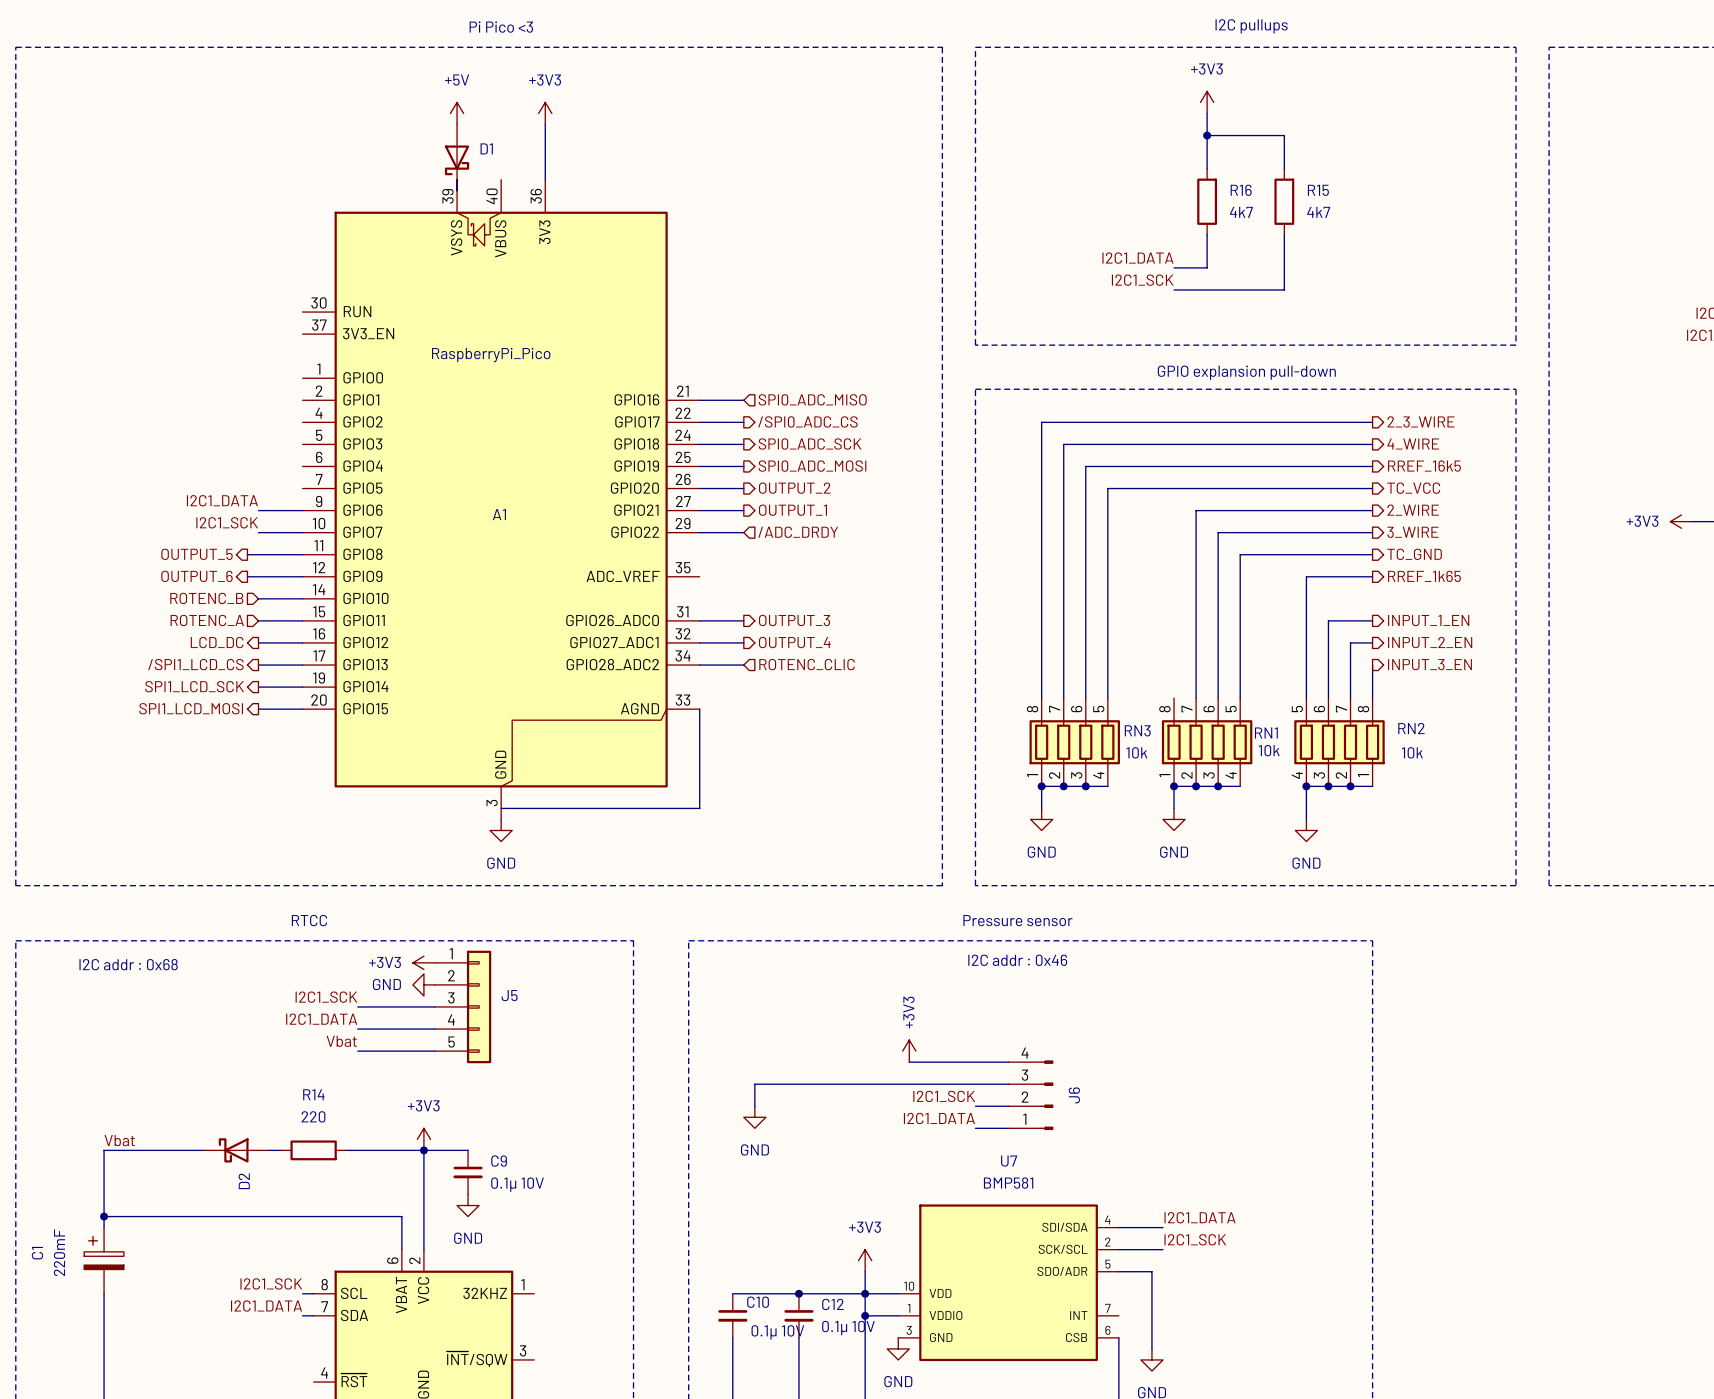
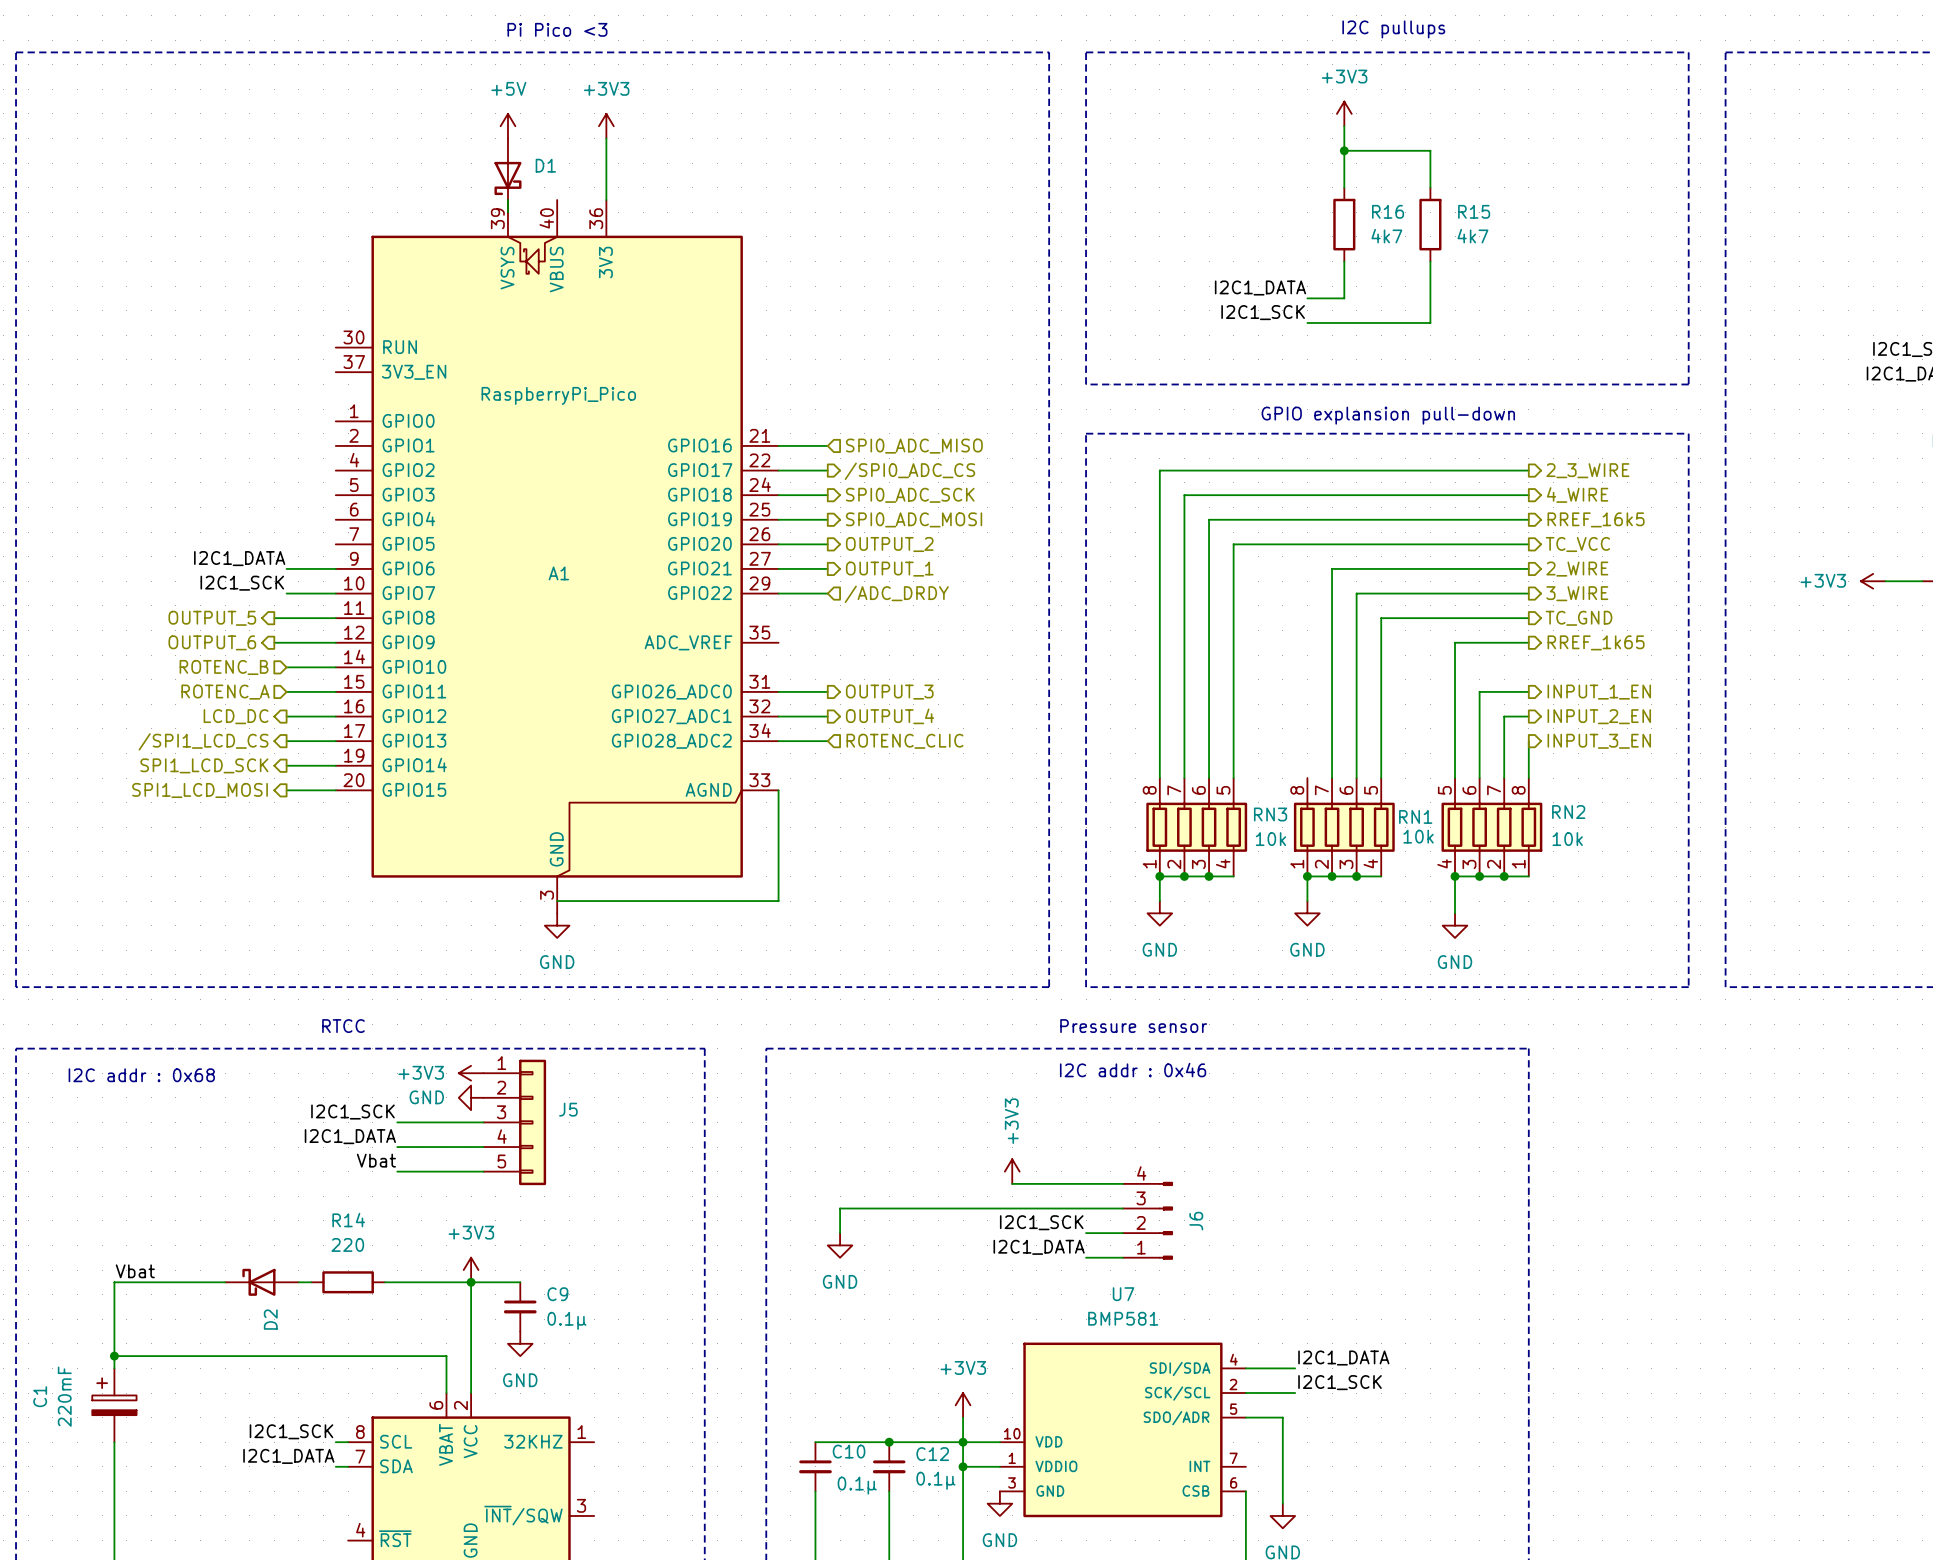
C9 value: 0.1µ 10V (517, 1184) -> 0.1µ (566, 1320)
C12 value: 0.1µ 10V (848, 1328) -> 0.1µ (935, 1480)
C10 value: 0.1µ 10V (777, 1332) -> 0.1µ (857, 1485)

